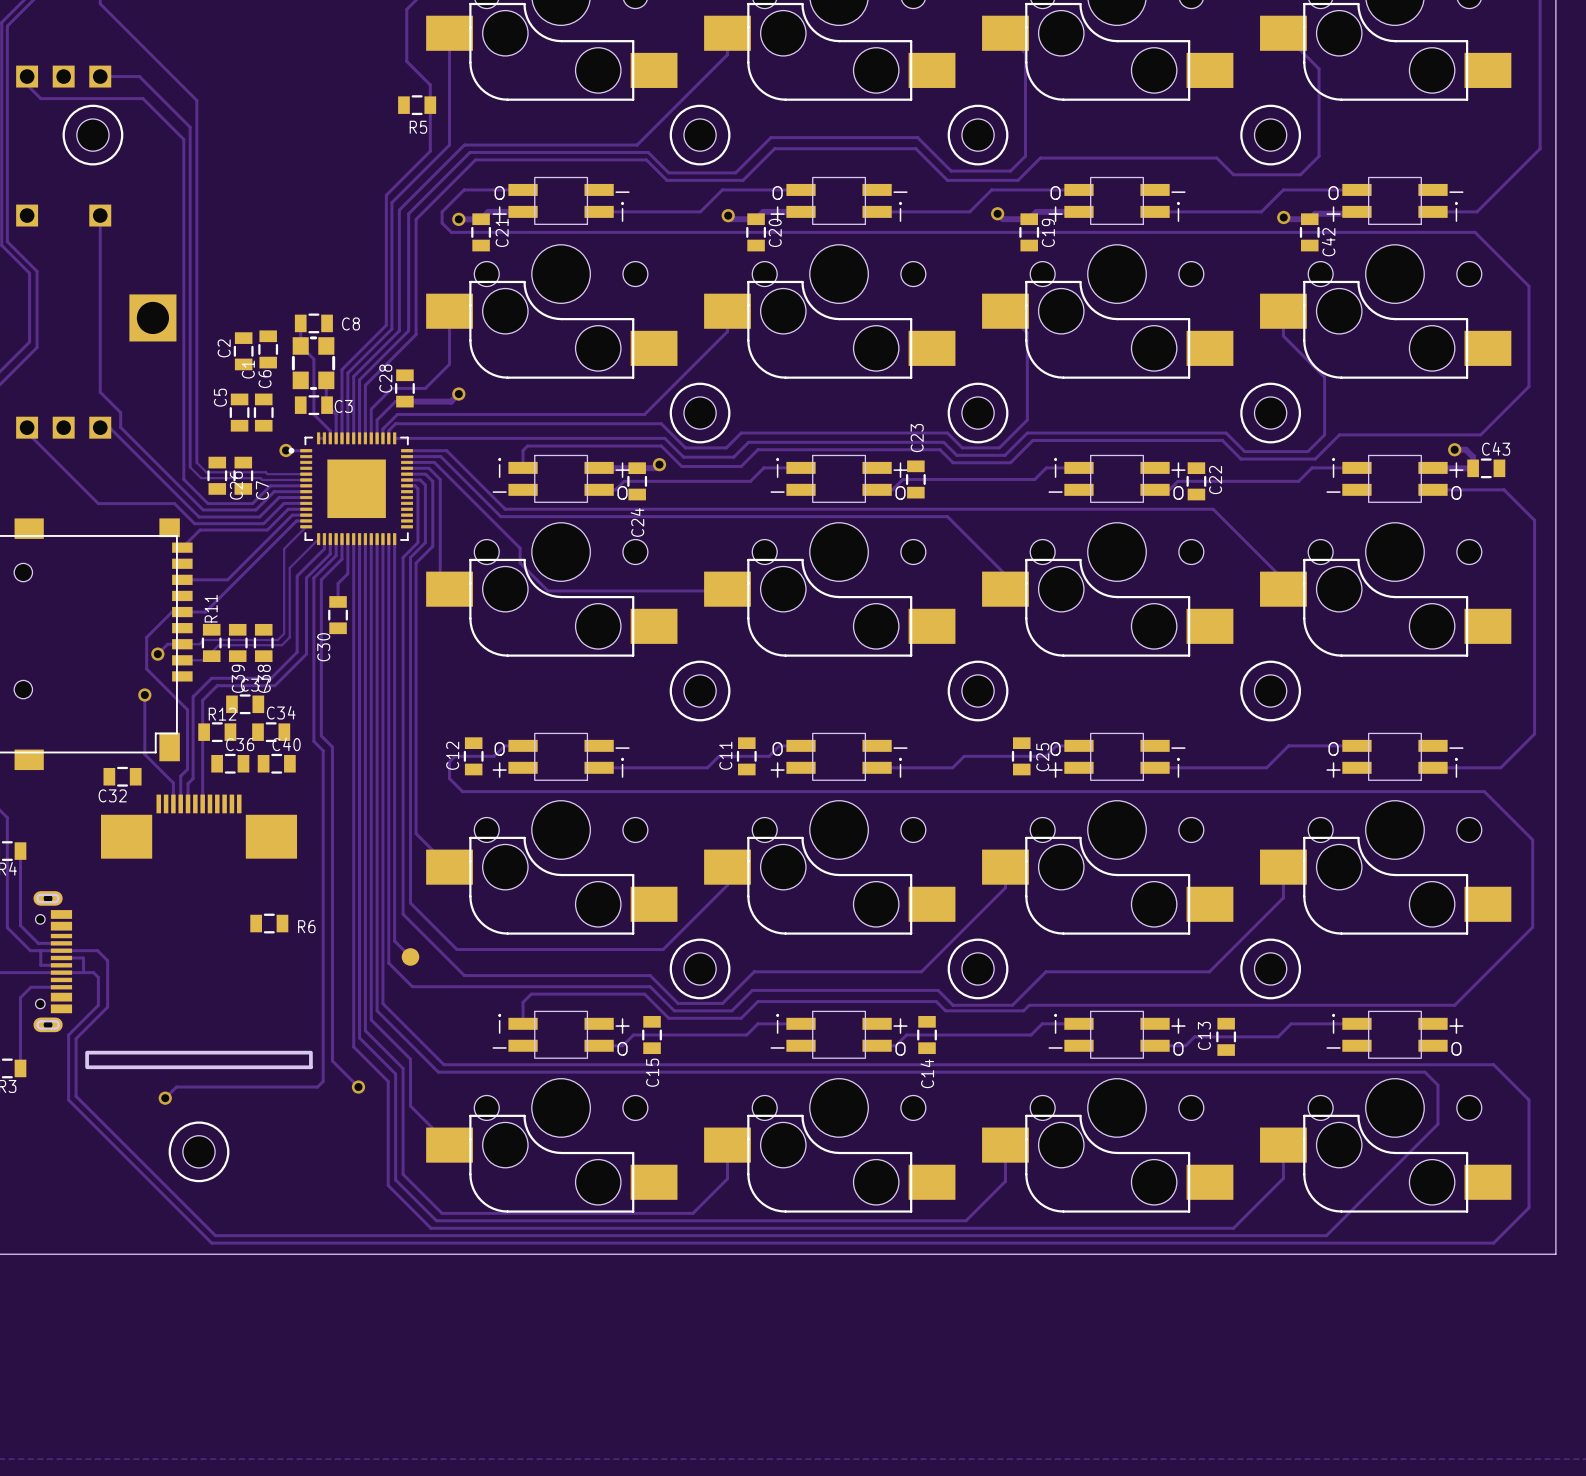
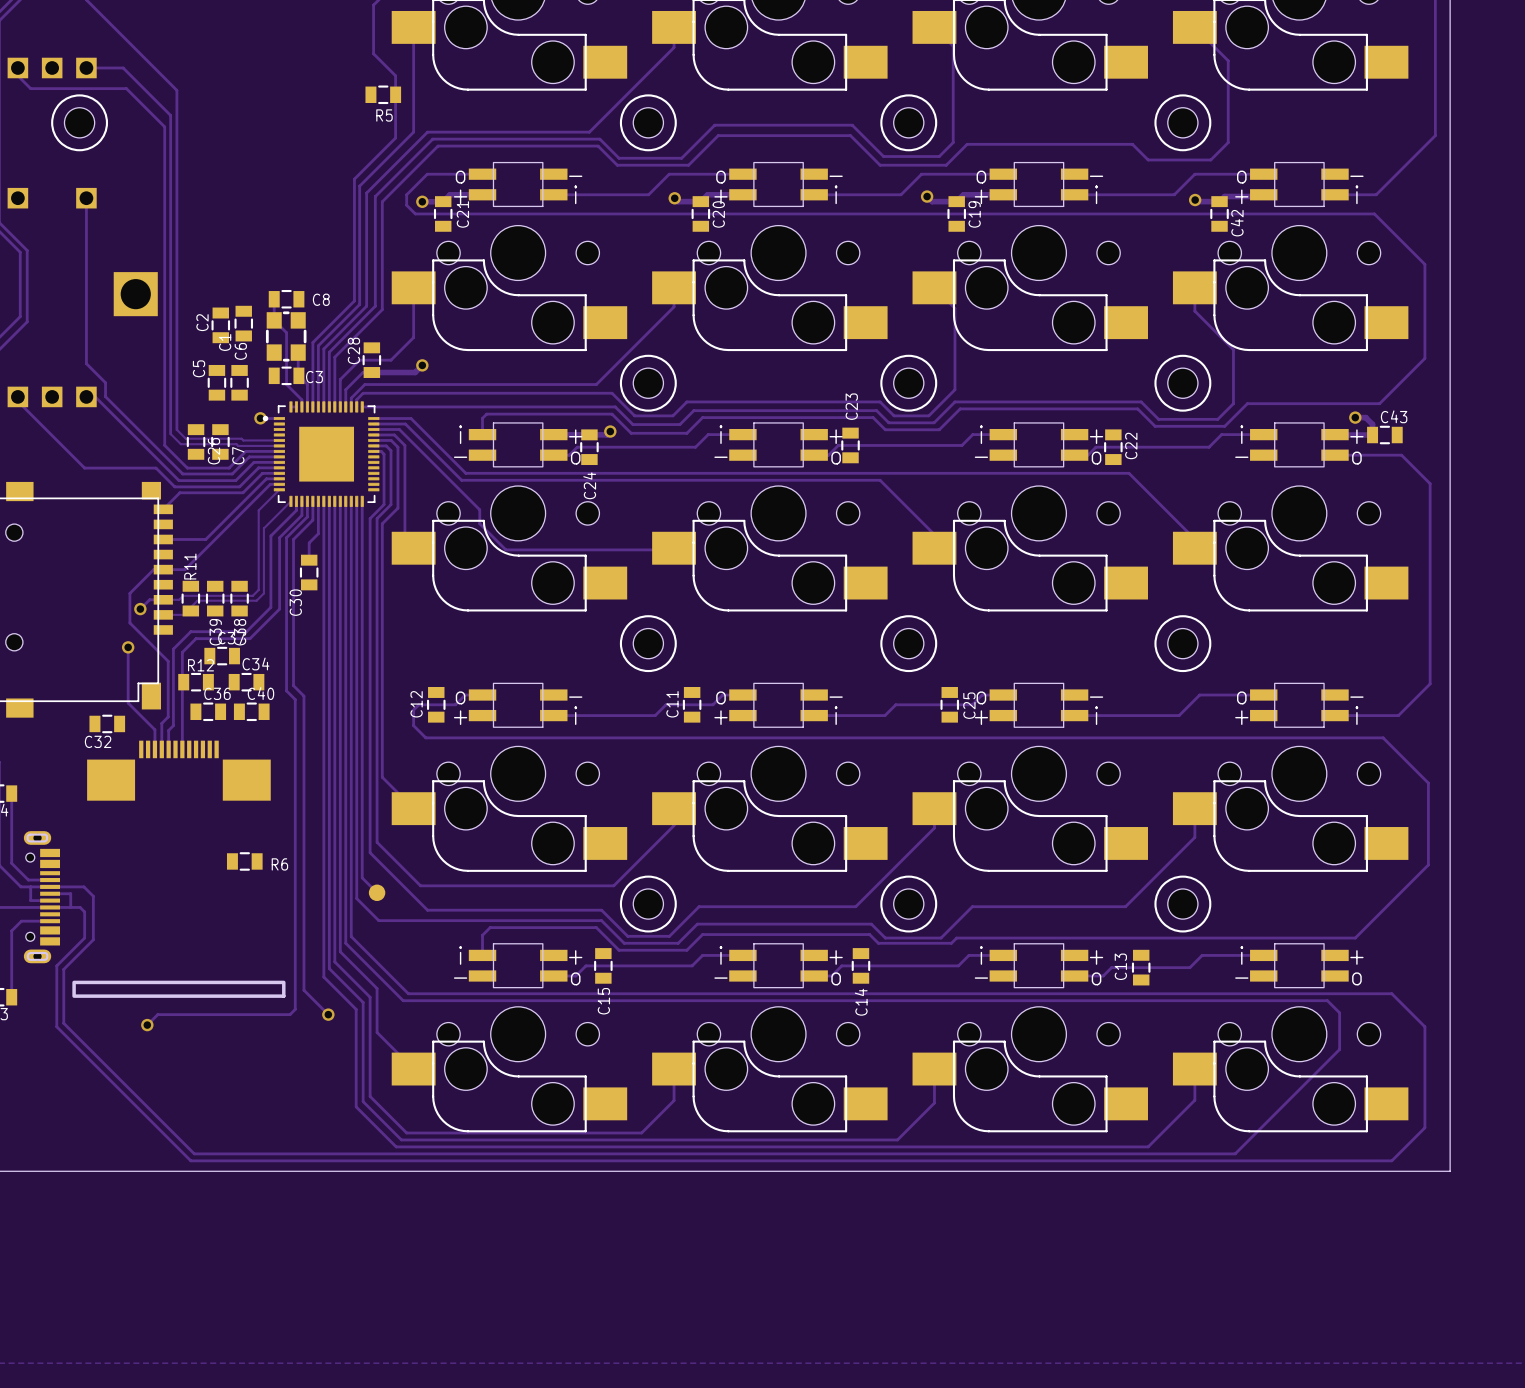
part: (199, 1151) -> none

